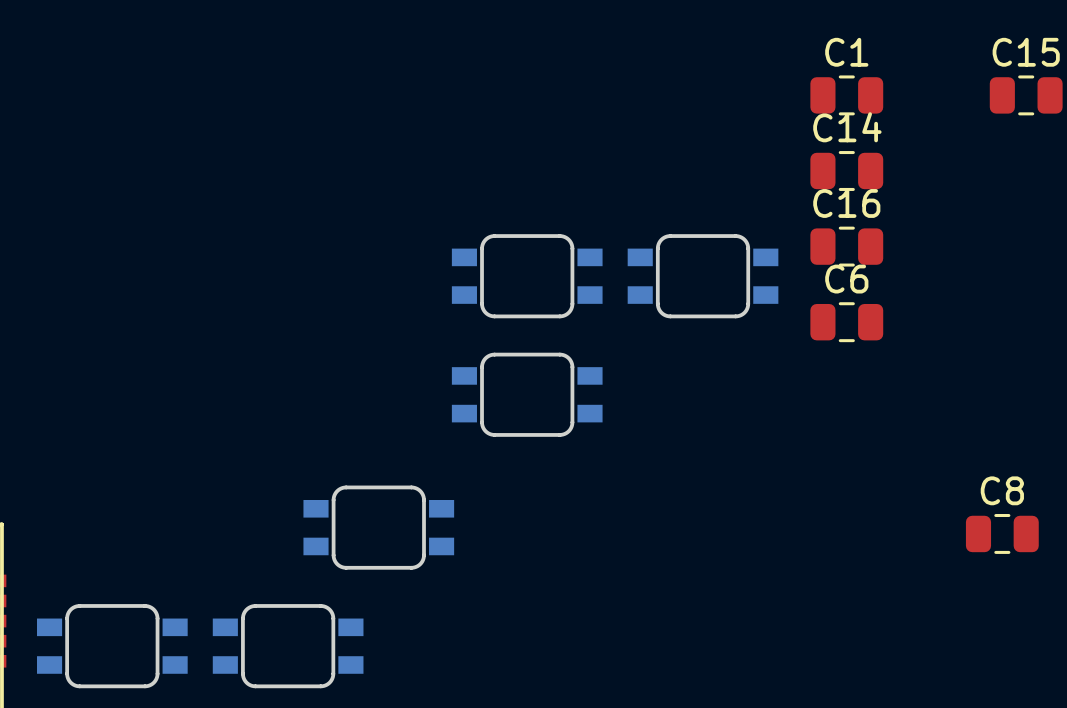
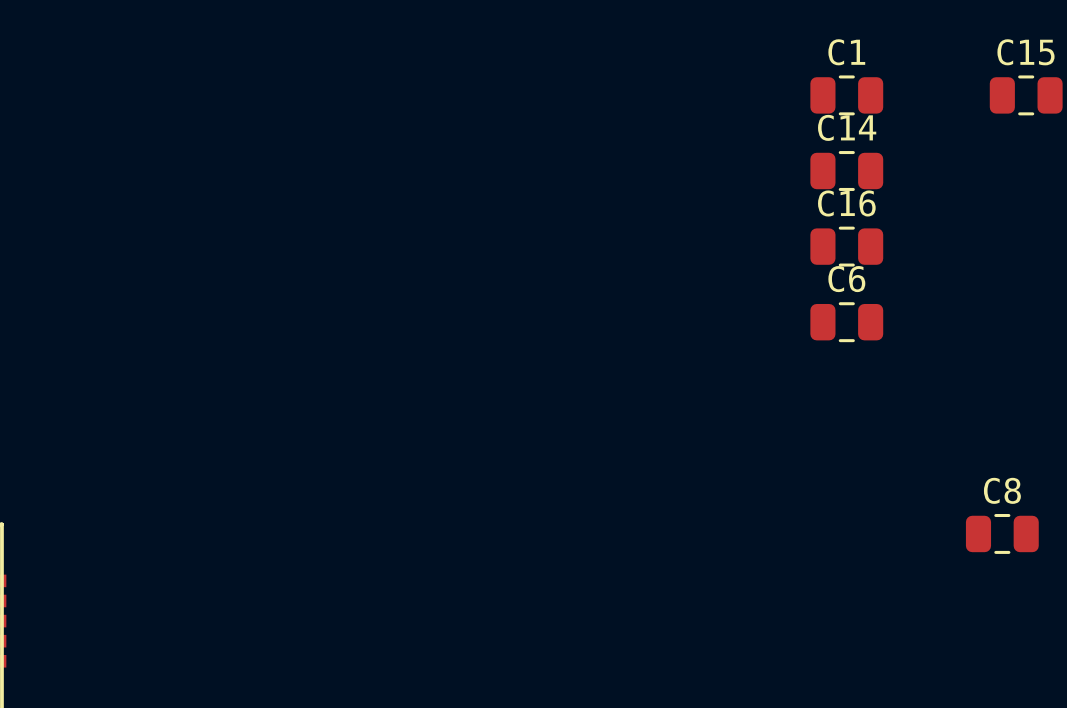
part: (527, 276) -> none
part: (703, 276) -> none
part: (527, 394) -> none
part: (378, 527) -> none
part: (112, 646) -> none
part: (288, 646) -> none

